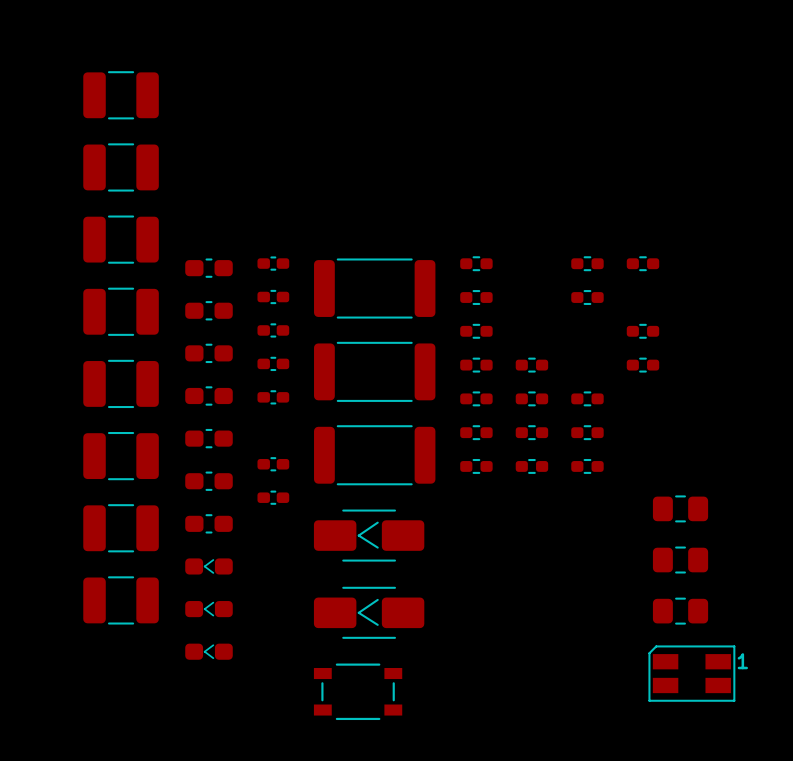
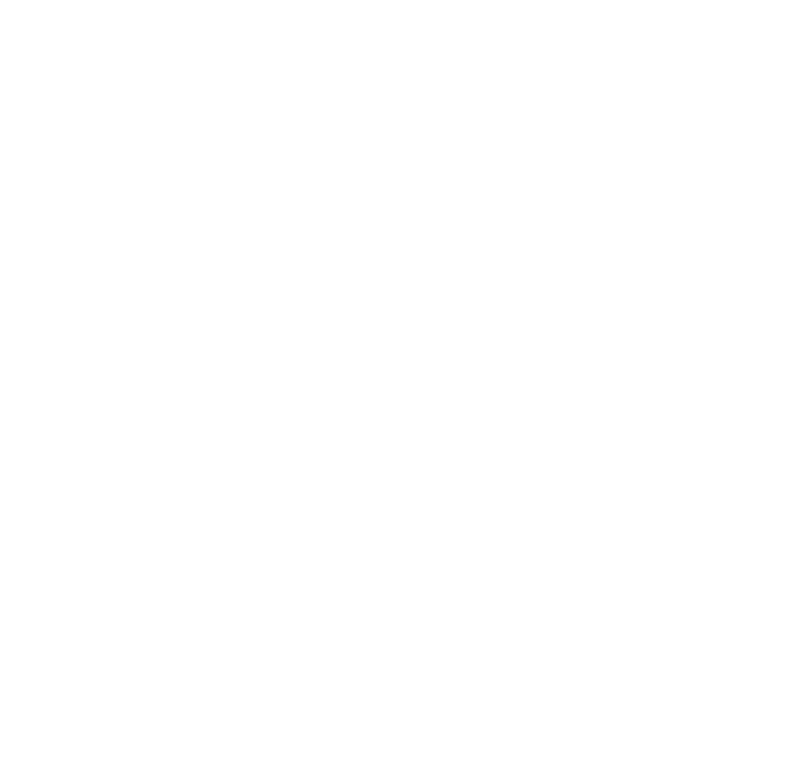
part: (121, 95) -> none
part: (121, 167) -> none
part: (121, 239) -> none
part: (273, 263) -> none
part: (476, 263) -> none
part: (587, 263) -> none
part: (642, 263) -> none
part: (209, 268) -> none
part: (374, 288) -> none
part: (273, 297) -> none
part: (476, 297) -> none
part: (587, 297) -> none
part: (209, 310) -> none
part: (121, 311) -> none
part: (273, 330) -> none
part: (476, 331) -> none
part: (642, 331) -> none
part: (209, 353) -> none
part: (273, 363) -> none
part: (476, 365) -> none
part: (531, 365) -> none
part: (642, 365) -> none
part: (374, 371) -> none
part: (121, 383) -> none
part: (209, 395) -> none
part: (273, 397) -> none
part: (476, 398) -> none
part: (531, 398) -> none
part: (587, 398) -> none
part: (476, 432) -> none
part: (531, 432) -> none
part: (587, 432) -> none
part: (209, 438) -> none
part: (374, 455) -> none
part: (121, 456) -> none
part: (273, 464) -> none
part: (476, 466) -> none
part: (531, 466) -> none
part: (587, 466) -> none
part: (209, 481) -> none
part: (273, 497) -> none
part: (680, 508) -> none
part: (209, 523) -> none
part: (121, 528) -> none
part: (369, 535) -> none
part: (680, 560) -> none
part: (209, 566) -> none
part: (121, 600) -> none
part: (209, 609) -> none
part: (680, 611) -> none
part: (369, 612) -> none
part: (209, 651) -> none
part: (691, 673) -> none
part: (358, 691) -> none

